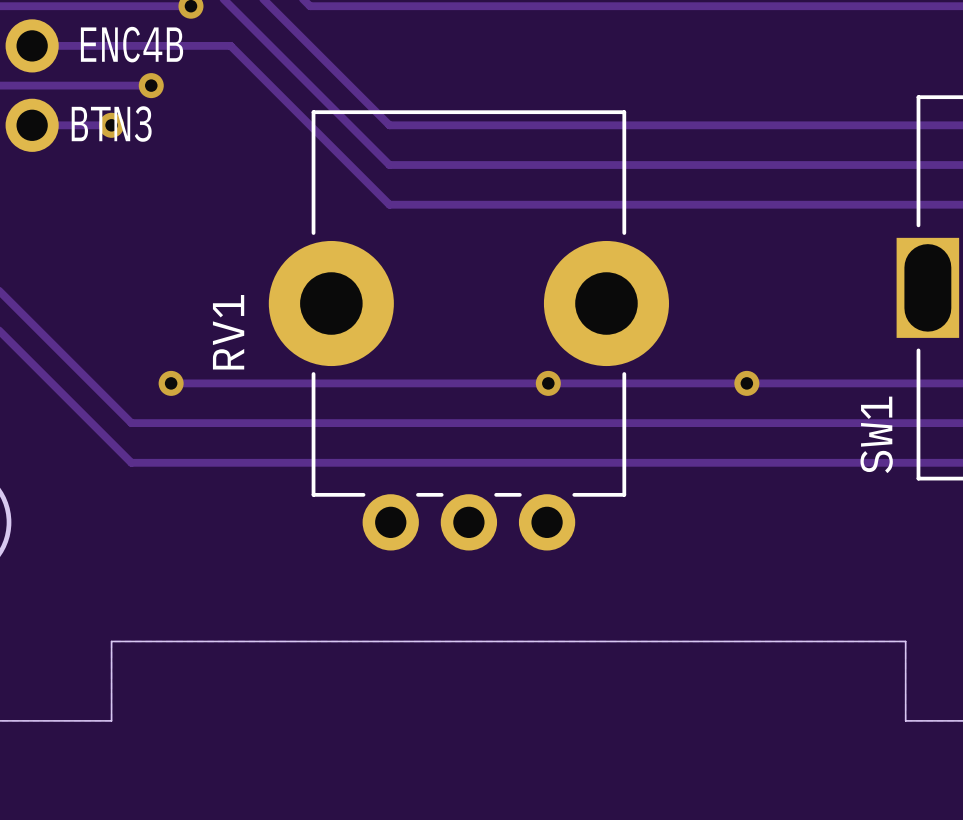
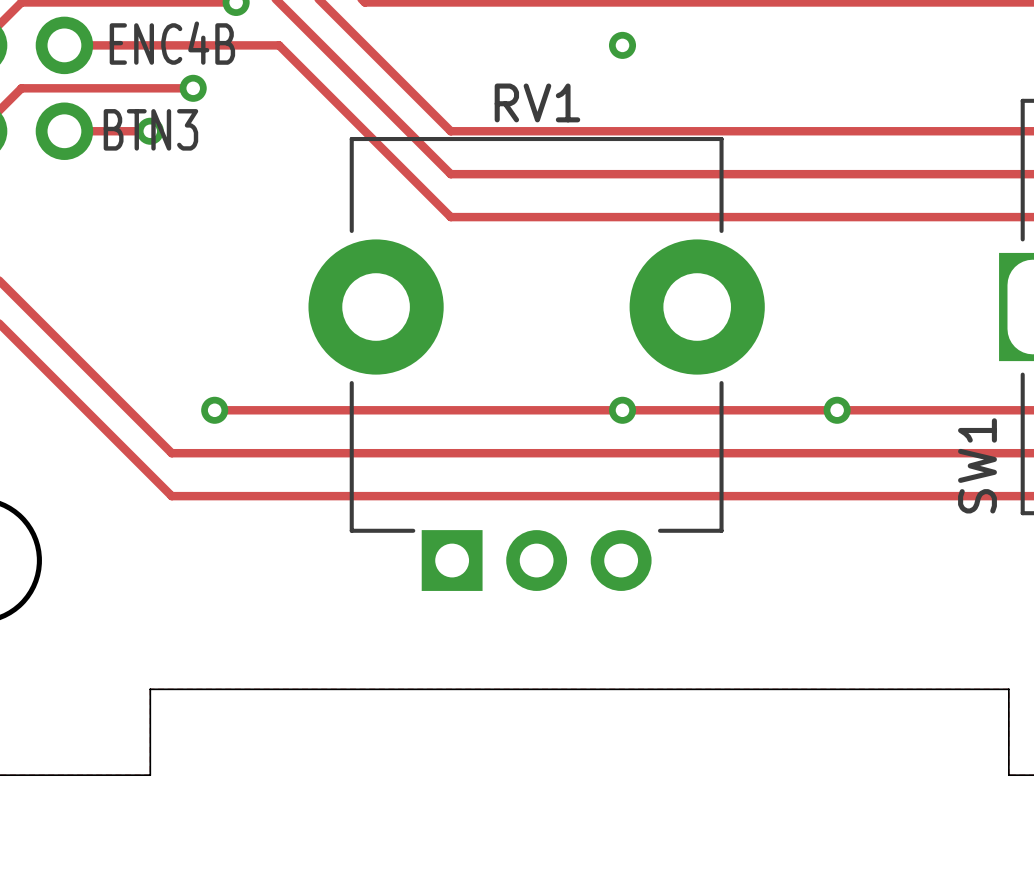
via: none -> (622, 45)
RV1 footprint: [268, 110, 670, 551] -> [308, 136, 765, 591]
RV1 name position: RV1 (228, 332) -> RV1 (537, 102)

